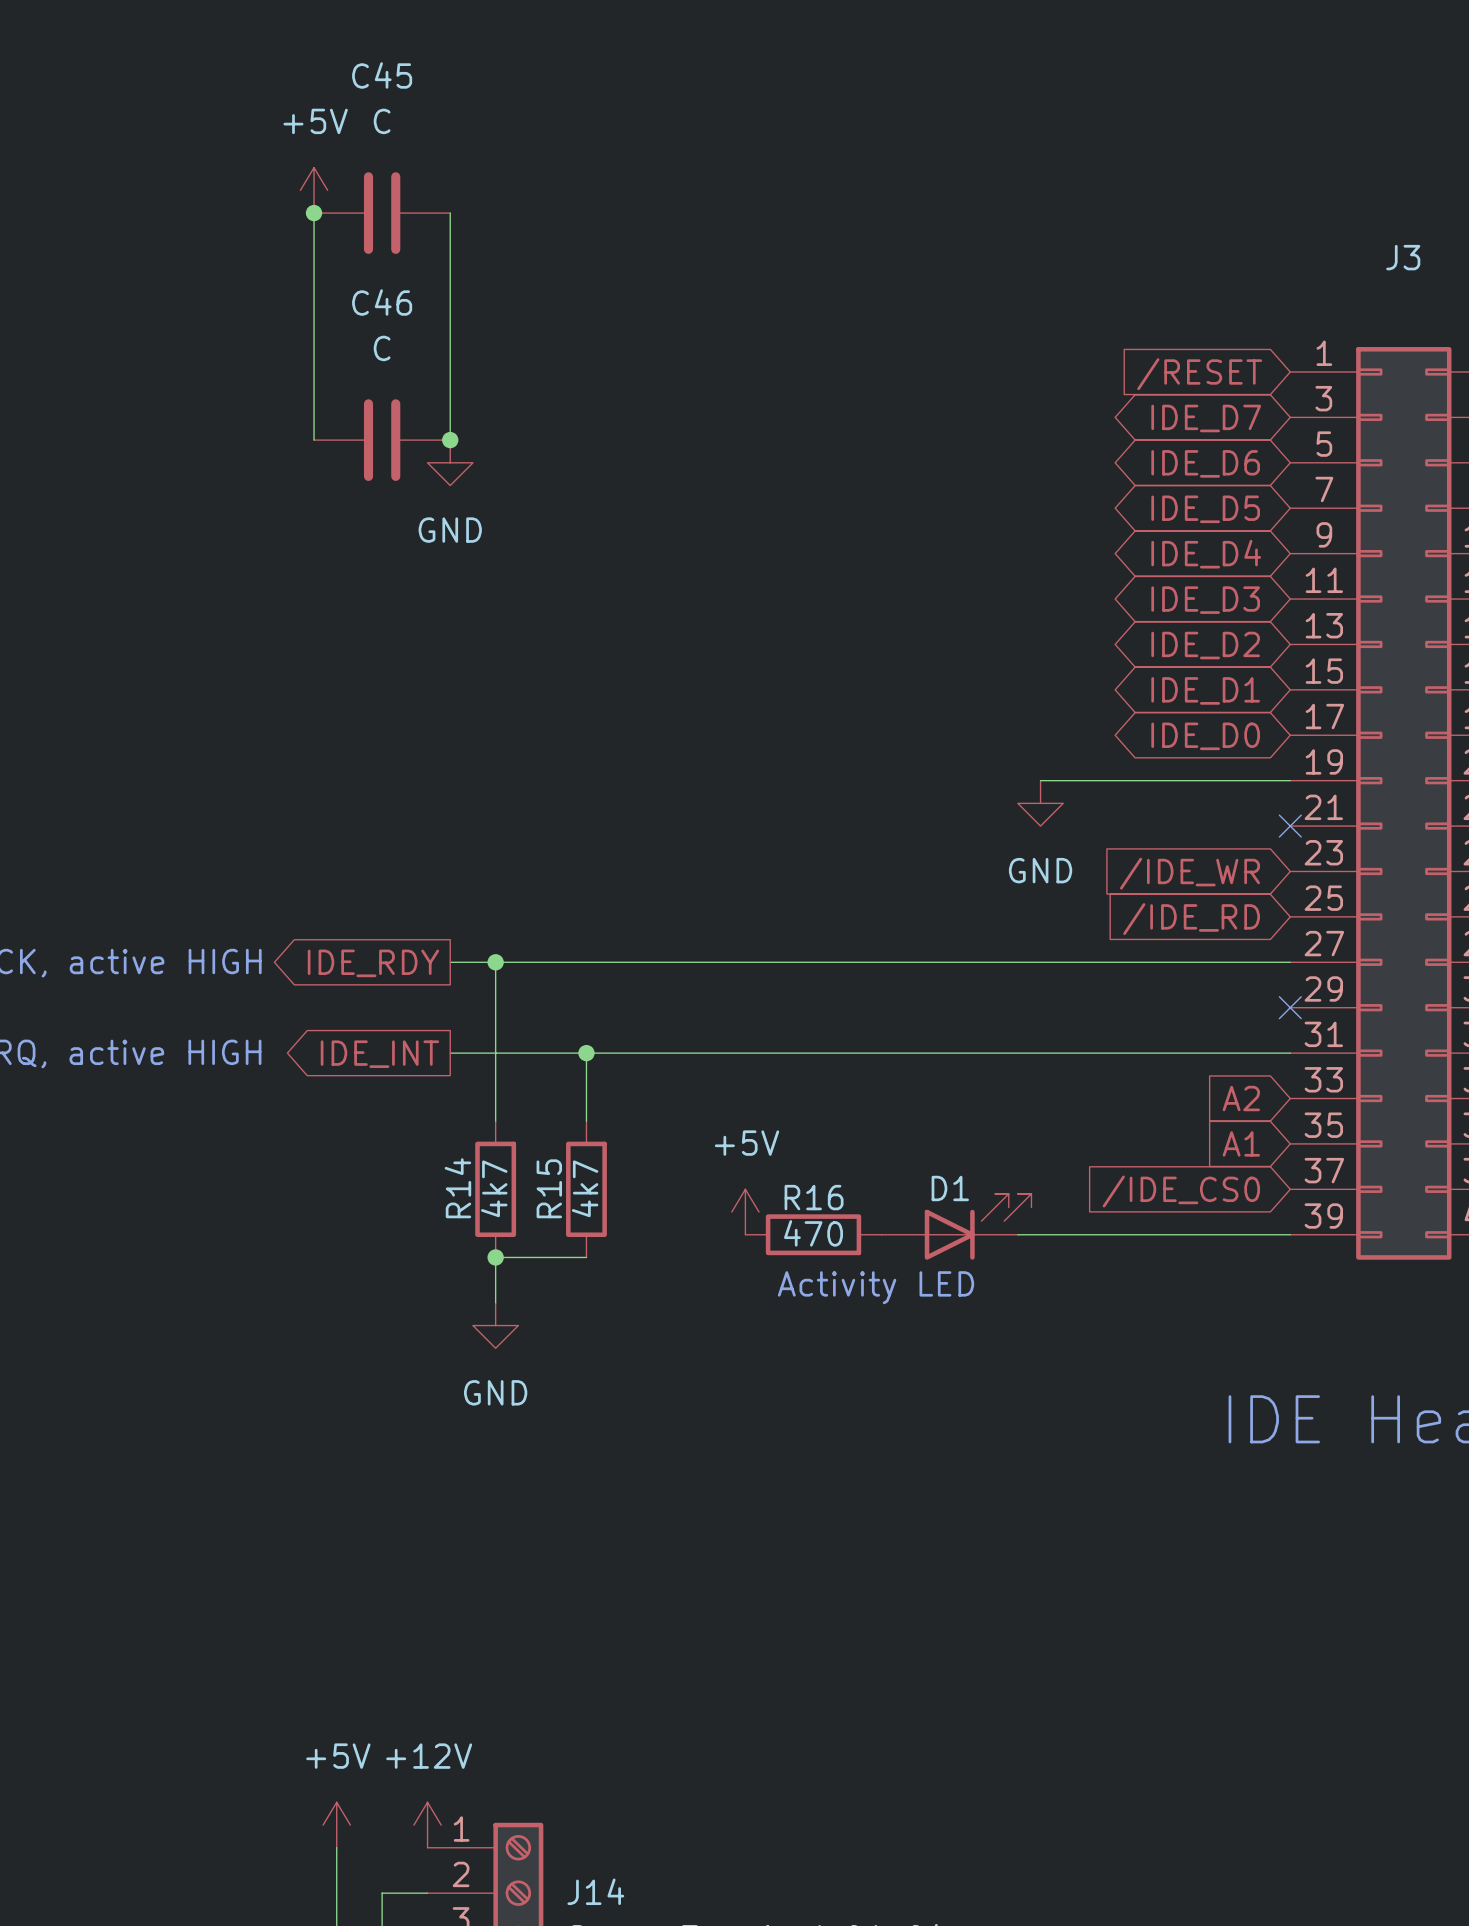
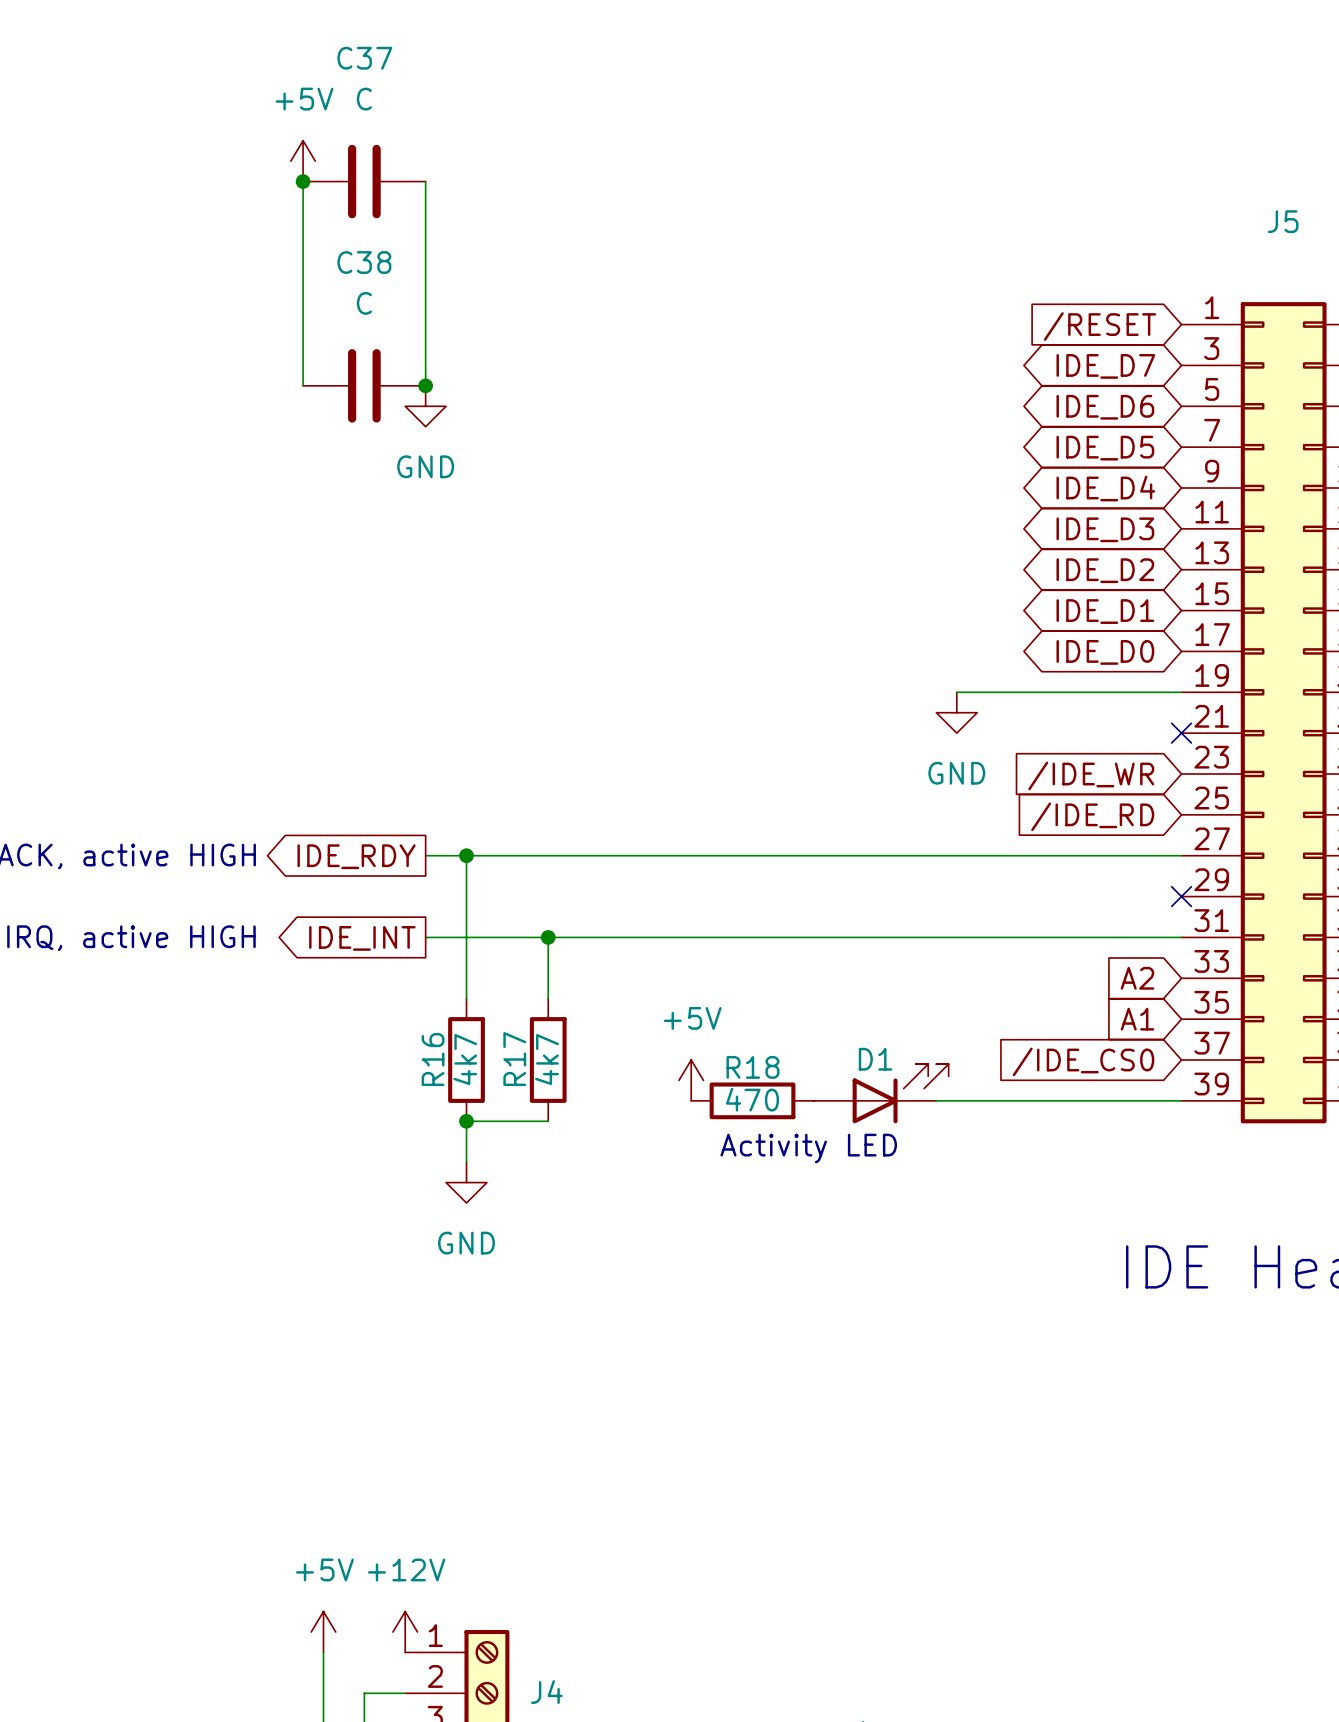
C45 name: C45 (382, 75) -> C37 (364, 58)
J3 name: J3 (1403, 257) -> J5 (1283, 221)
C46 name: C46 (382, 302) -> C38 (364, 262)
R14 name: R14 (457, 1188) -> R16 (433, 1059)
R15 name: R15 (549, 1188) -> R17 (514, 1059)
R16 name: R16 (814, 1197) -> R18 (752, 1067)
J14 name: J14 (595, 1891) -> J4 (546, 1692)

